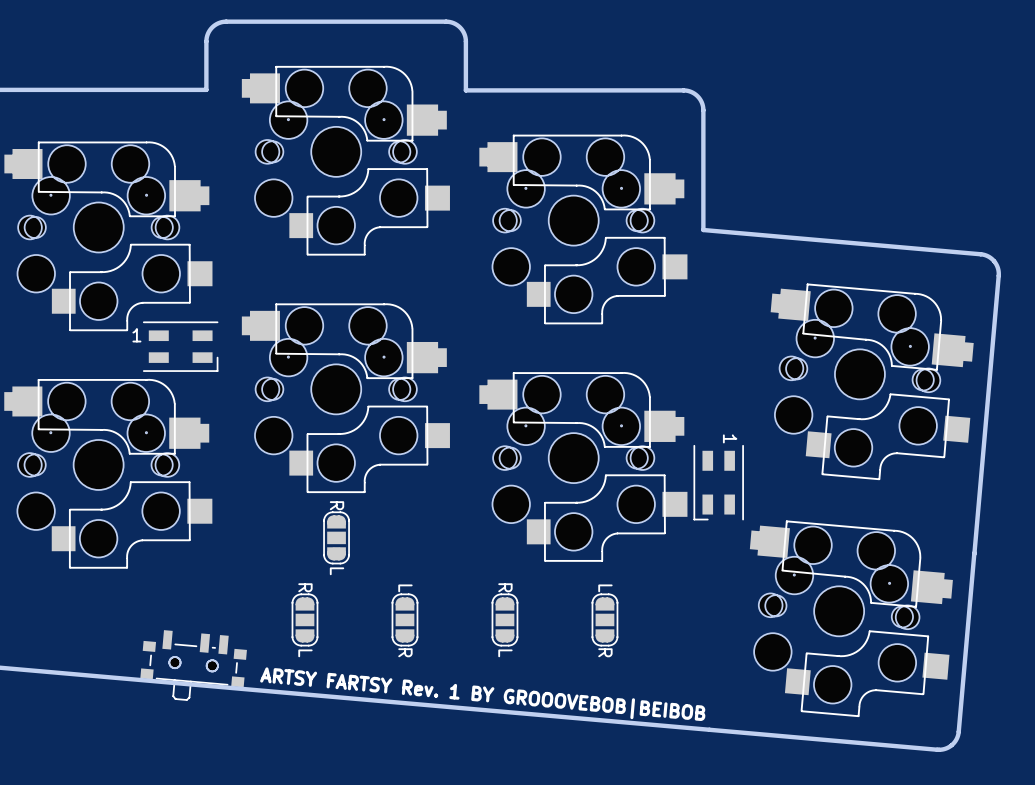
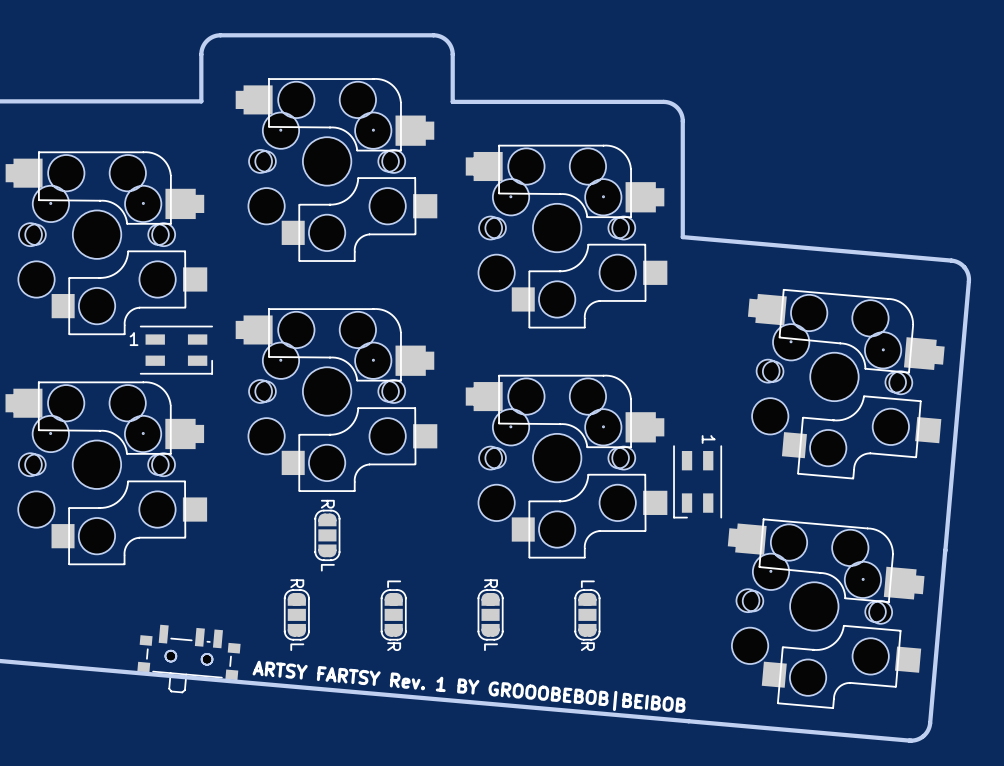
text: ARTSY FARTSY Rev. 1 BY GROOOVEBOB|BEIBOB (482, 694) -> ARTSY FARTSY Rev. 1 BY GROOOBEBOB|BEIBOB (469, 686)

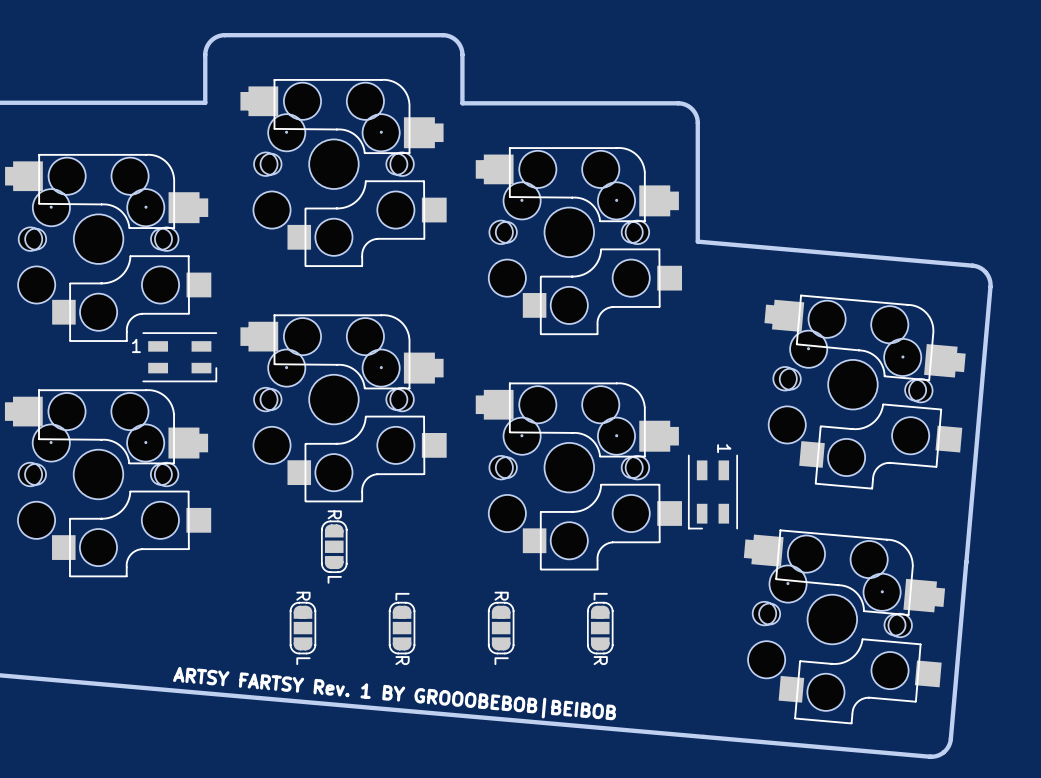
part: (188, 657) -> none
part: (188, 658) -> none
text position: ARTSY FARTSY Rev. 1 BY GROOOBEBOB|BEIBOB (469, 686) -> ARTSY FARTSY Rev. 1 BY GROOOBEBOB|BEIBOB (394, 693)

